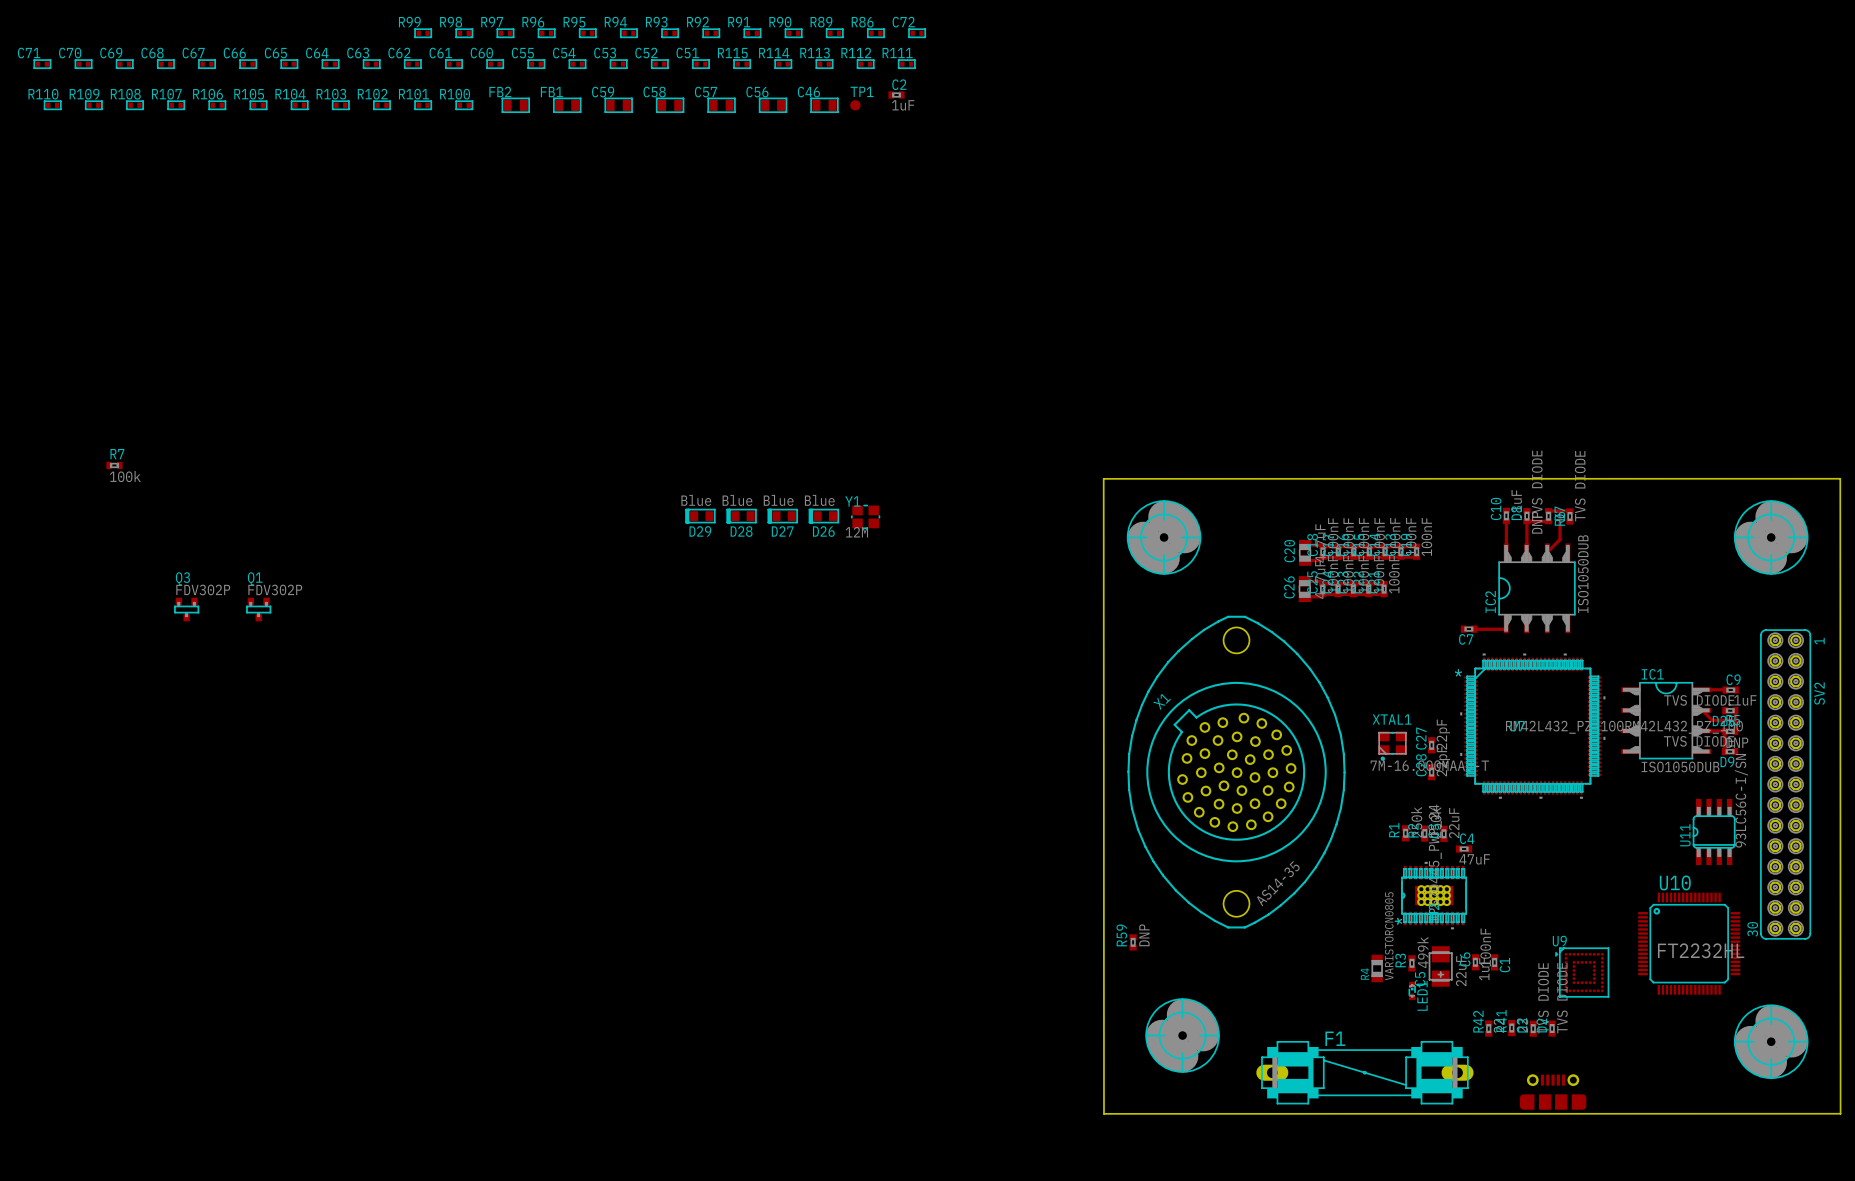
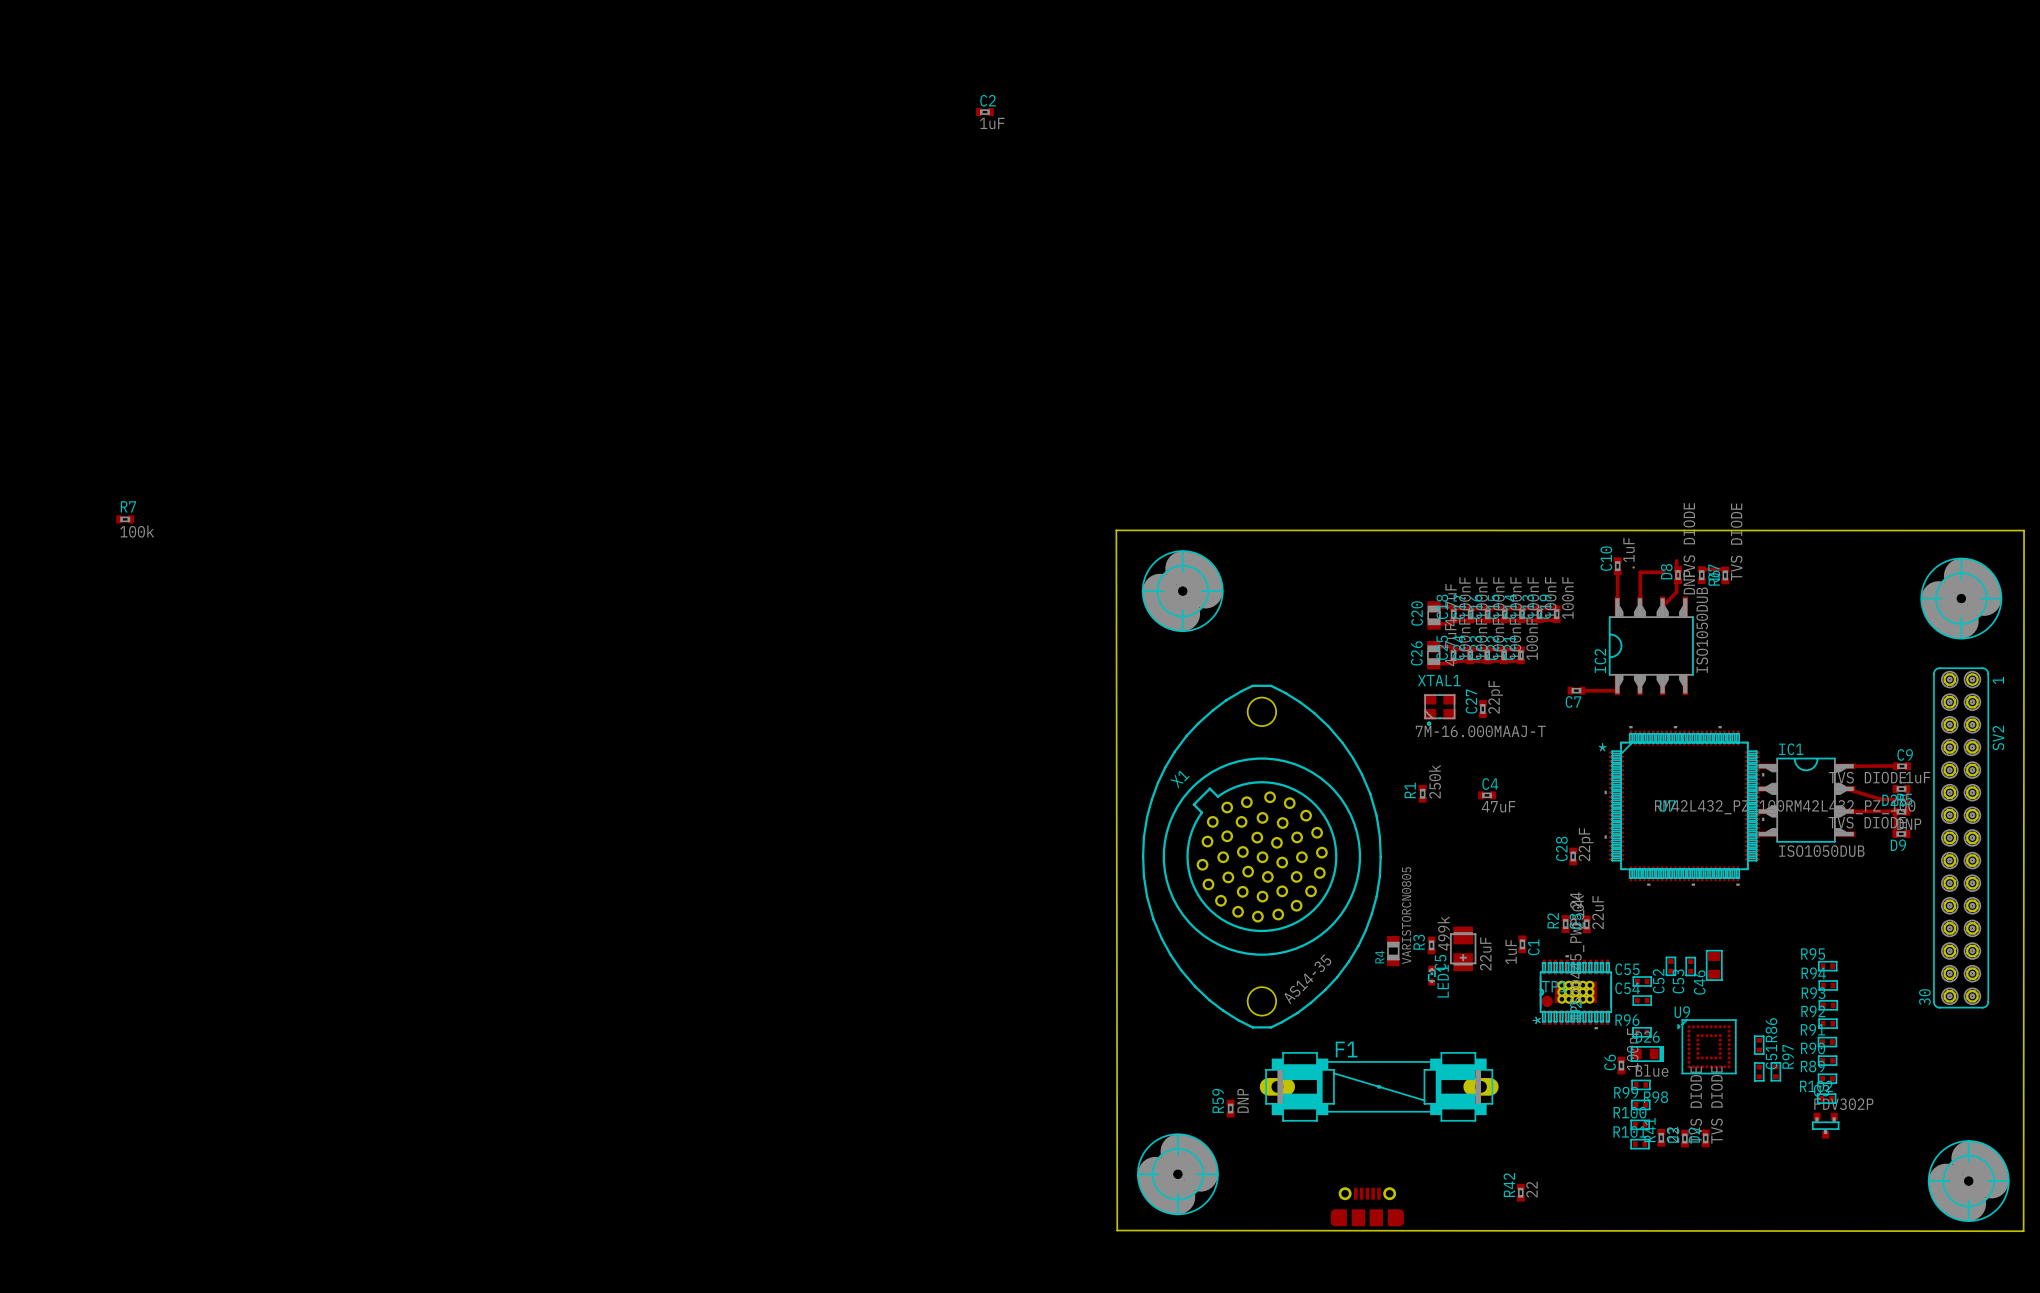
R98 name position: R98 (451, 22) -> R98 (1656, 1097)
R99 position: (423, 33) -> (1640, 1104)
R98 position: (464, 33) -> (1640, 1084)
R97 rotation: 0° (505, 33) -> 90° clockwise (1775, 1071)
R97 position: (505, 33) -> (1775, 1071)
R96 position: (546, 33) -> (1642, 1032)
R95 position: (587, 33) -> (1827, 966)
R94 position: (628, 33) -> (1828, 985)
R93 position: (670, 33) -> (1828, 1005)
R92 position: (711, 33) -> (1827, 1023)
R91 position: (752, 33) -> (1827, 1042)
R90 position: (793, 33) -> (1827, 1060)
R89 position: (834, 33) -> (1827, 1078)
R86 rotation: 0° (875, 33) -> 90° clockwise (1759, 1045)
R86 position: (875, 33) -> (1759, 1045)
C72: (917, 33) -> none
C53 name position: C53 (605, 53) -> C53 (1678, 981)
C52 name position: C52 (646, 53) -> C52 (1658, 981)
C71: (42, 64) -> none
C70: (83, 64) -> none
C69: (124, 64) -> none
C68: (165, 64) -> none
C67: (207, 64) -> none
C66: (248, 64) -> none
C65: (289, 64) -> none
C64: (330, 64) -> none
C63: (371, 64) -> none
C62: (412, 64) -> none
C61: (454, 64) -> none
C60: (495, 64) -> none
C55 position: (536, 64) -> (1642, 981)
C54 position: (577, 64) -> (1642, 1000)
C53 rotation: 0° (618, 64) -> 90° clockwise (1690, 966)
C53 position: (618, 64) -> (1690, 966)
C52 rotation: 0° (659, 64) -> 90° clockwise (1670, 966)
C52 position: (659, 64) -> (1670, 966)
C51 rotation: 0° (700, 64) -> 90° clockwise (1759, 1071)
C51 position: (700, 64) -> (1759, 1071)
R115: (742, 64) -> none
R114: (783, 64) -> none
R113: (824, 64) -> none
R112: (865, 64) -> none
R111: (906, 64) -> none
C46 name position: C46 (808, 92) -> C46 (1699, 982)
R110: (52, 105) -> none
R109: (93, 105) -> none
R108: (135, 105) -> none
R107: (176, 105) -> none
R106: (217, 105) -> none
R105: (258, 105) -> none
R104: (299, 105) -> none
R103: (340, 105) -> none
R102 position: (381, 105) -> (1826, 1098)
R101 position: (423, 105) -> (1640, 1144)
R100 position: (464, 105) -> (1640, 1124)
FB2: (515, 105) -> none
FB1: (567, 105) -> none
C59: (618, 105) -> none
C58: (670, 105) -> none
C57: (721, 105) -> none
C56: (773, 105) -> none
C46 rotation: 0° (824, 105) -> 90° clockwise (1714, 965)
C46 position: (824, 105) -> (1714, 965)
TP1 position: (855, 105) -> (1547, 1001)
board edge: (1840, 478) (1840, 1113) (1103, 1113) (1103, 478) (1840, 478) -> (1116, 530) (1117, 1230) (2023, 1231) (2024, 530) (1116, 530)
track: (1560, 510) (1560, 539) (1547, 552) -> (1676, 560) (1676, 592) (1662, 606)
C10 position: (1506, 515) -> (1617, 566)
D29: Blue (700, 516) -> none
D28: Blue (741, 516) -> none
D27: Blue (782, 516) -> none
D26 rotation: 0° (823, 516) -> 180° (1647, 1054)
D26 position: (823, 516) -> (1647, 1054)
Y1: 12M (865, 516) -> none
track: (1506, 521) (1506, 552) -> (1617, 571) (1617, 606)
track: (1548, 521) (1526, 521) (1526, 552) -> (1664, 572) (1640, 572) (1640, 606)
part position: (1164, 537) -> (1182, 591)
part position: (1771, 537) -> (1961, 598)
IC2 position: (1536, 588) -> (1651, 645)
Q3 position: (186, 609) -> (1825, 1125)
Q1: FDV302P (258, 609) -> none
C7 position: (1468, 629) -> (1576, 690)
track: (1474, 629) (1505, 629) -> (1582, 690) (1617, 690)
track: (1702, 689) (1725, 689) -> (1845, 766) (1895, 765)
track: (1702, 710) (1712, 720) -> (1845, 788) (1881, 799)
IC1 position: (1666, 720) -> (1806, 800)
track: (1702, 730) (1724, 730) -> (1845, 811) (1895, 811)
C27 position: (1431, 745) -> (1482, 708)
XTAL1 position: (1392, 746) -> (1439, 709)
X1 position: (1236, 772) -> (1261, 856)
SV2 position: (1785, 784) -> (1961, 837)
U11: 93LC56C-I/SN (1714, 831) -> none
R1 position: (1405, 833) -> (1422, 793)
C4 position: (1464, 849) -> (1487, 795)
R59 position: (1133, 942) -> (1230, 1108)
U10: FT2232HL (1689, 943) -> none
C1 position: (1494, 962) -> (1522, 944)
R3 position: (1411, 963) -> (1431, 945)
C5 position: (1440, 966) -> (1463, 948)
R4 position: (1377, 968) -> (1393, 951)
U9 position: (1582, 972) -> (1706, 1046)
LED1 position: (1412, 990) -> (1431, 975)
R42 position: (1488, 1028) -> (1520, 1192)
part position: (1182, 1035) -> (1177, 1174)
part position: (1771, 1041) -> (1968, 1181)
F1 position: (1364, 1072) -> (1379, 1086)
part: none -> (1367, 1206)
part: (1553, 1091) -> none

